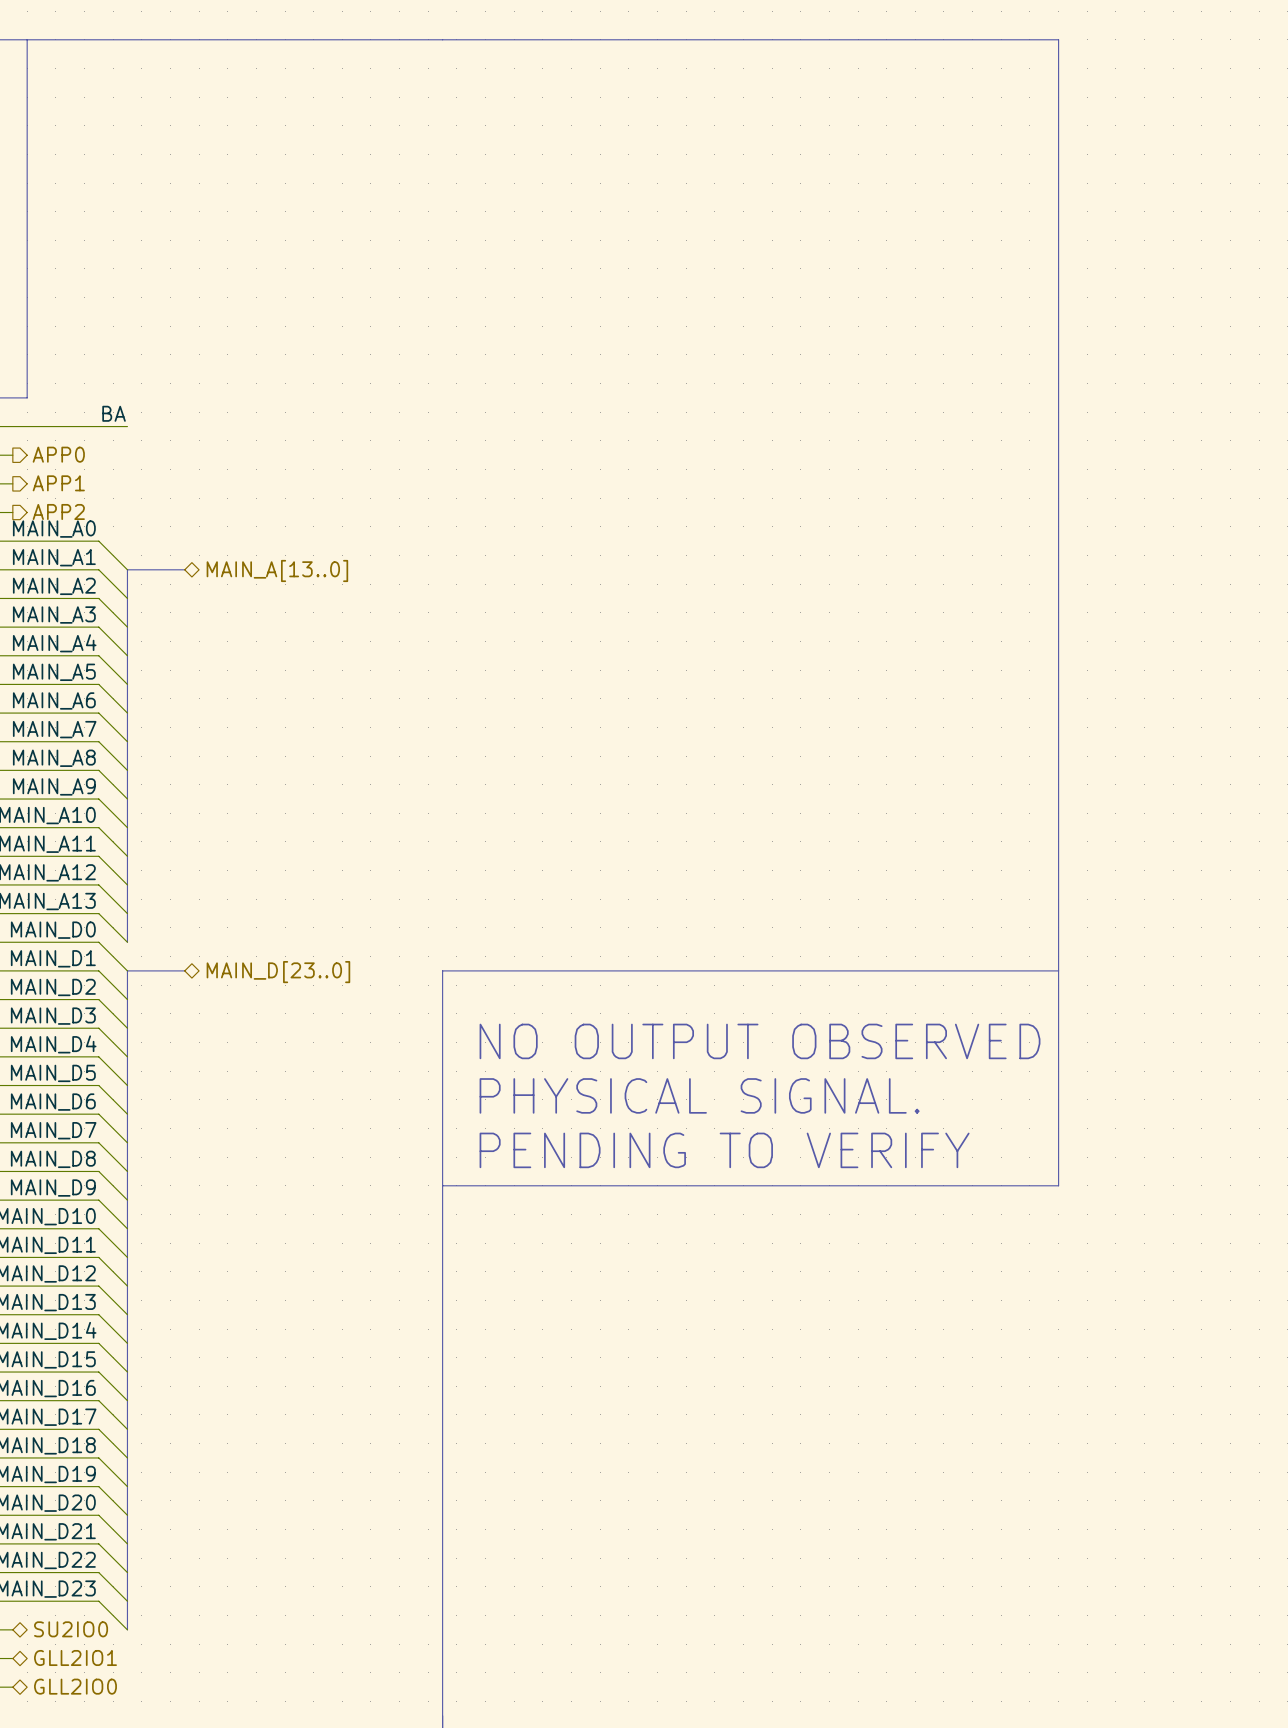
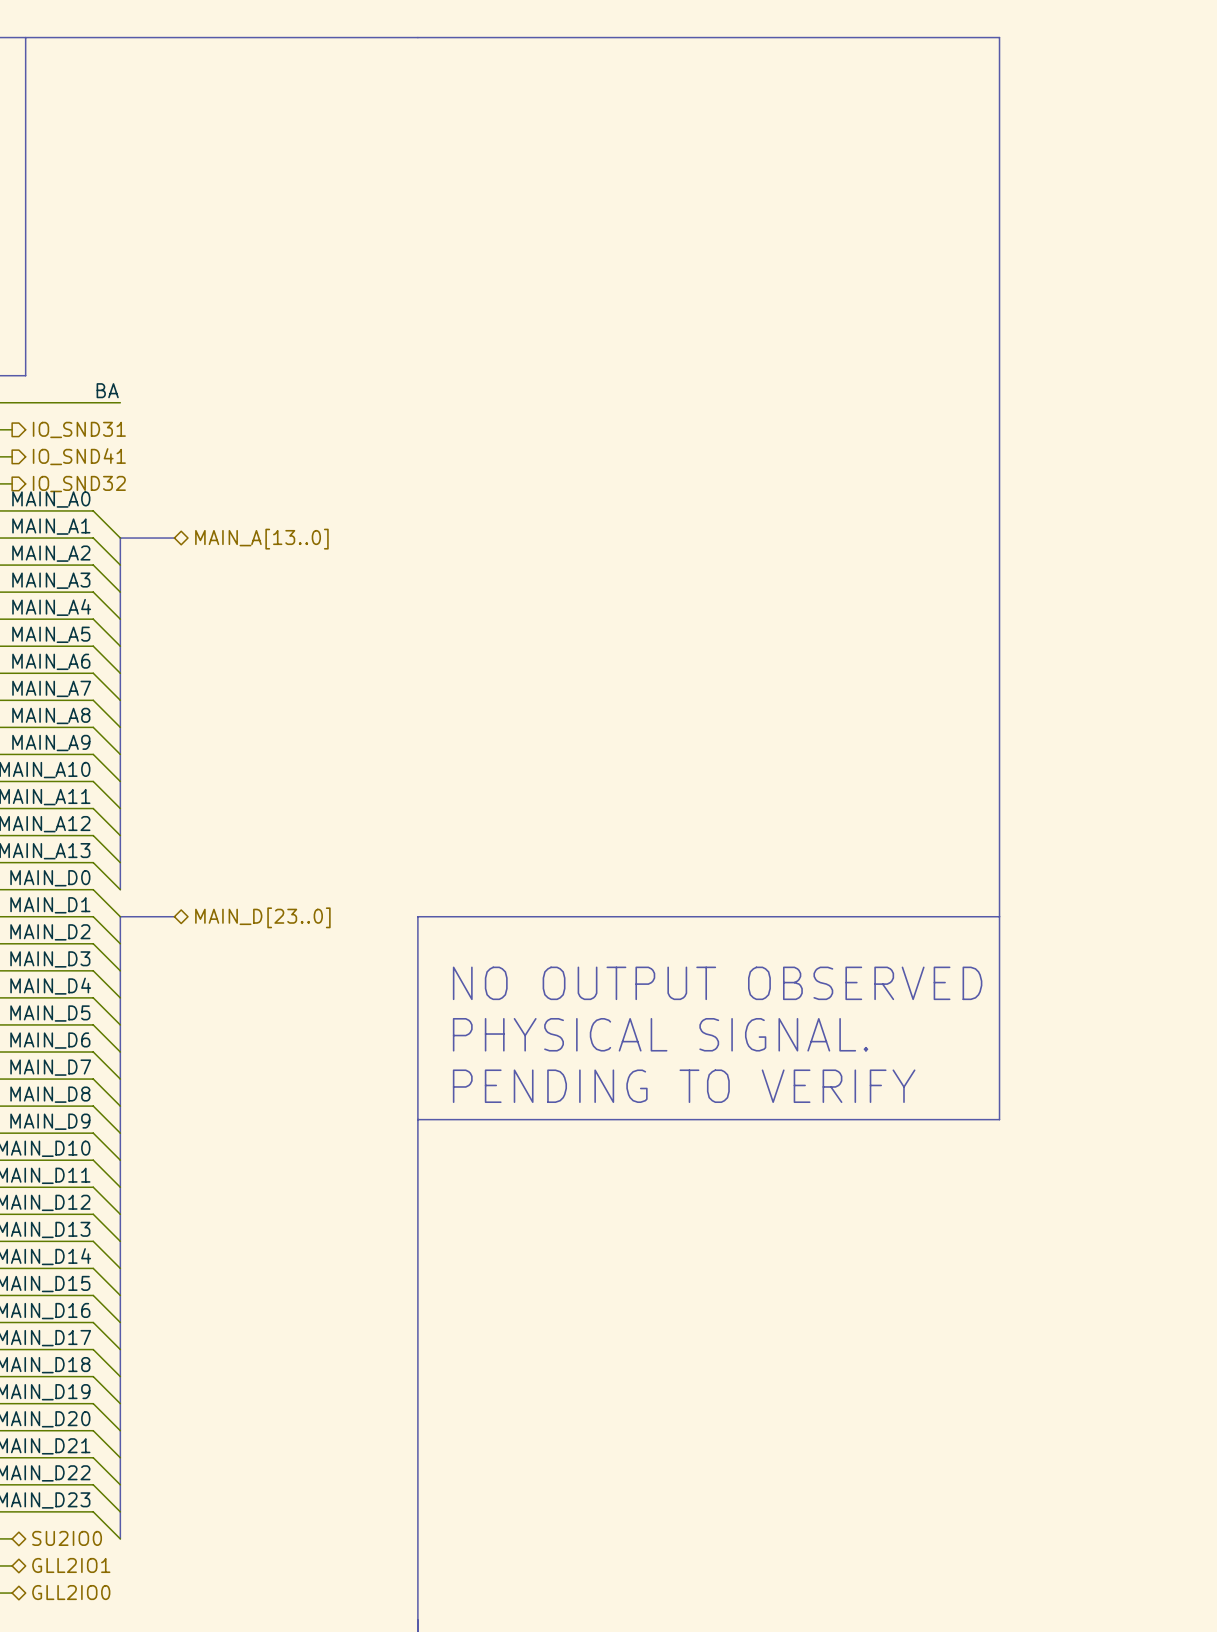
hierarchical label: APP0 (58, 454) -> IO_SND31 (79, 429)
hierarchical label: APP1 (58, 483) -> IO_SND41 (79, 456)
hierarchical label: APP2 (58, 511) -> IO_SND32 (79, 484)

